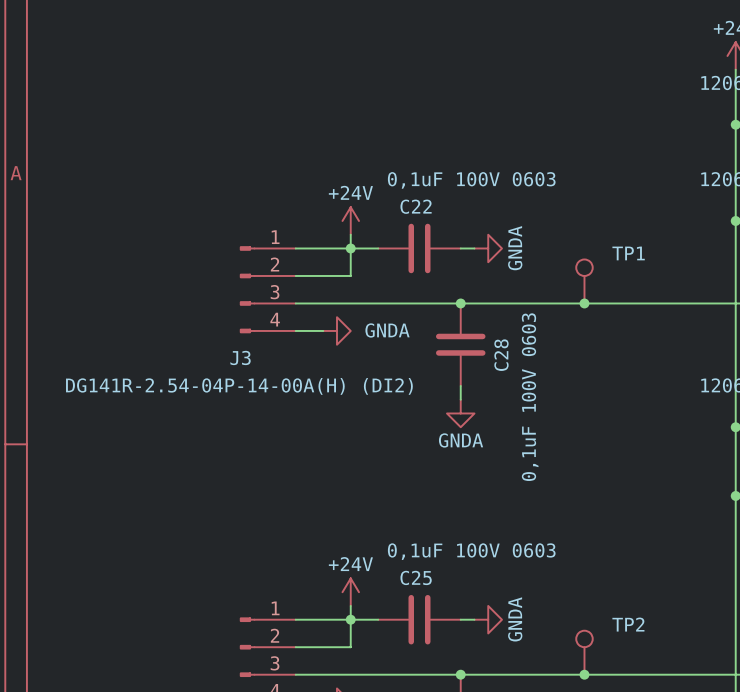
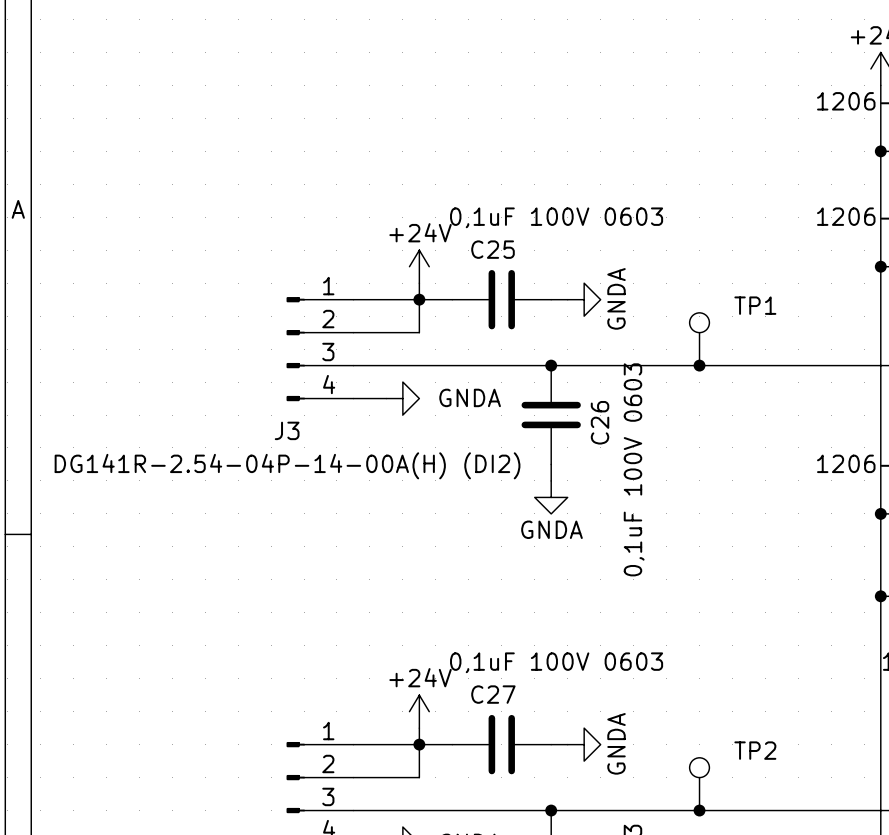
C22 name: C22 (416, 206) -> C25 (493, 249)
C28 name: C28 (501, 355) -> C26 (600, 422)
C25 name: C25 (416, 577) -> C27 (493, 694)

